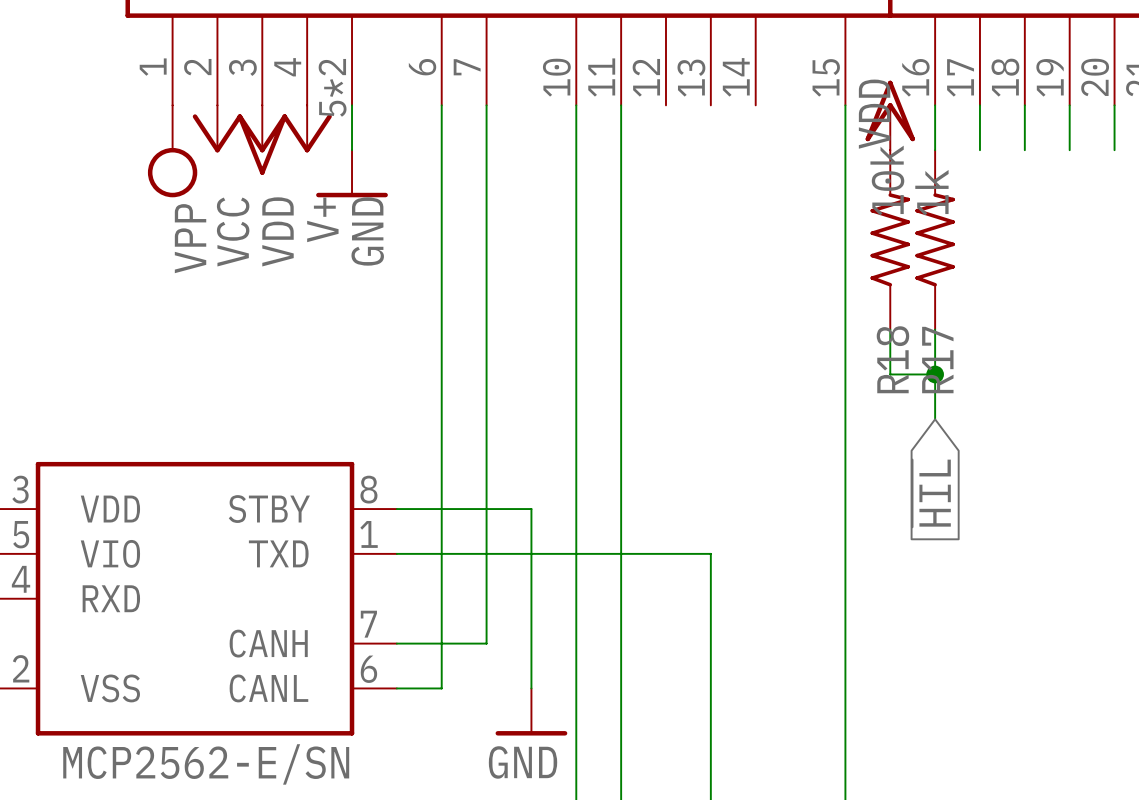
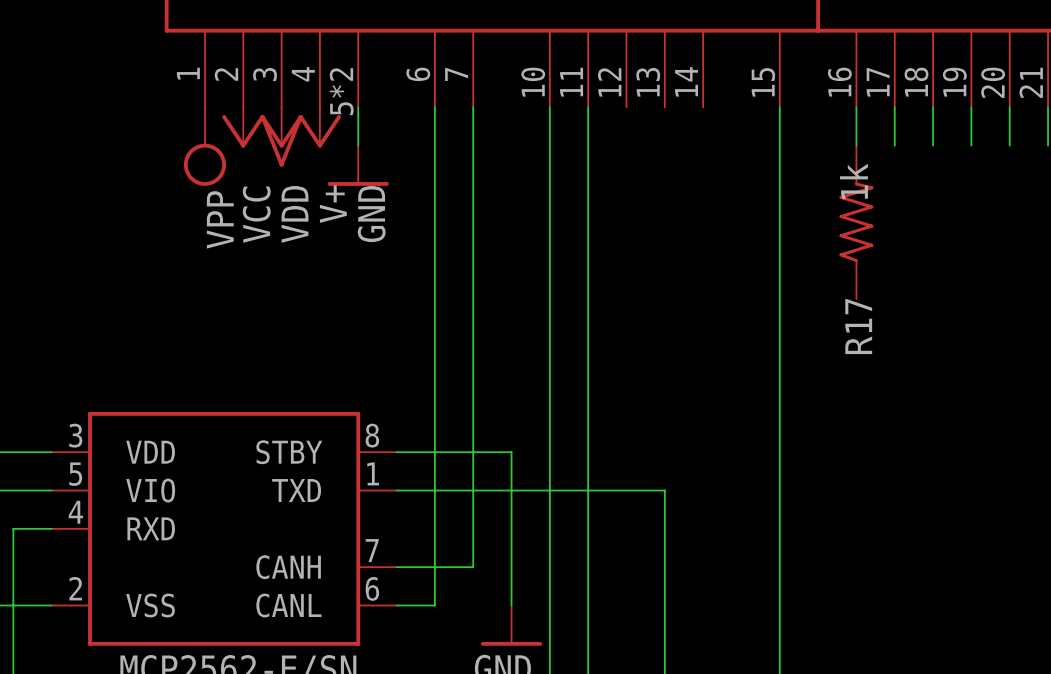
power symbol: VDD (890, 115) -> none
R18: 10k (890, 239) -> none
wire: (890, 329) (890, 374) (935, 374) -> none
wire: (935, 329) (935, 419) -> none
junction: (935, 374) -> none
global label: ~{HIL} (931, 493) -> none

